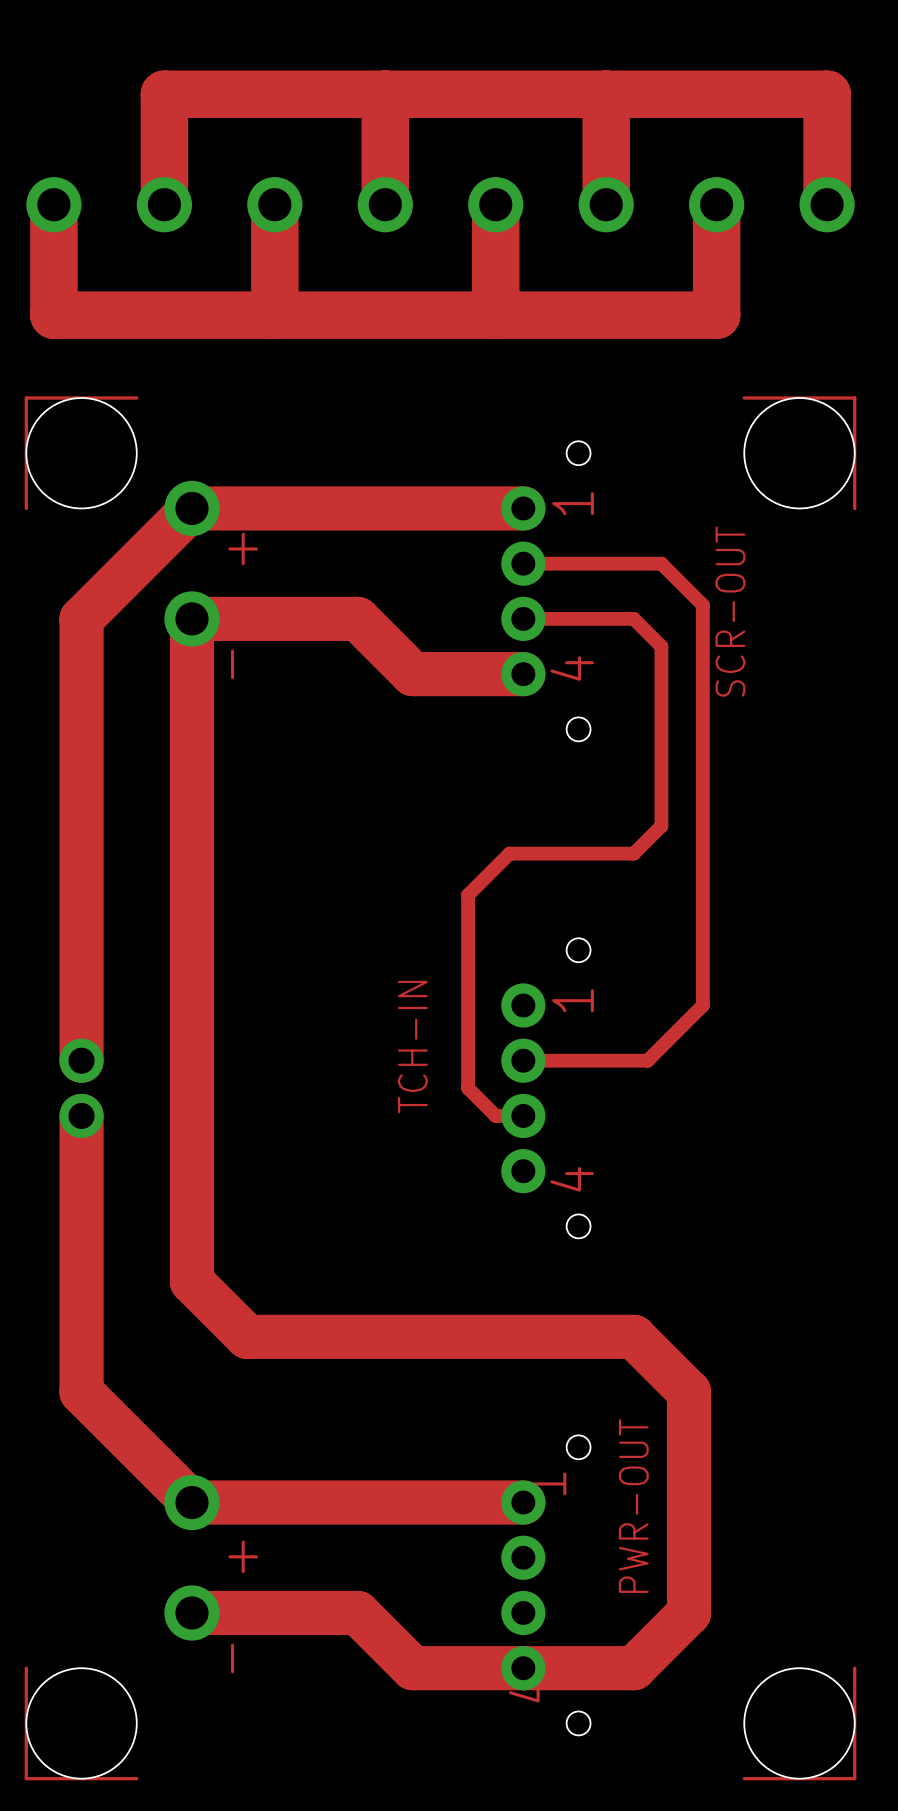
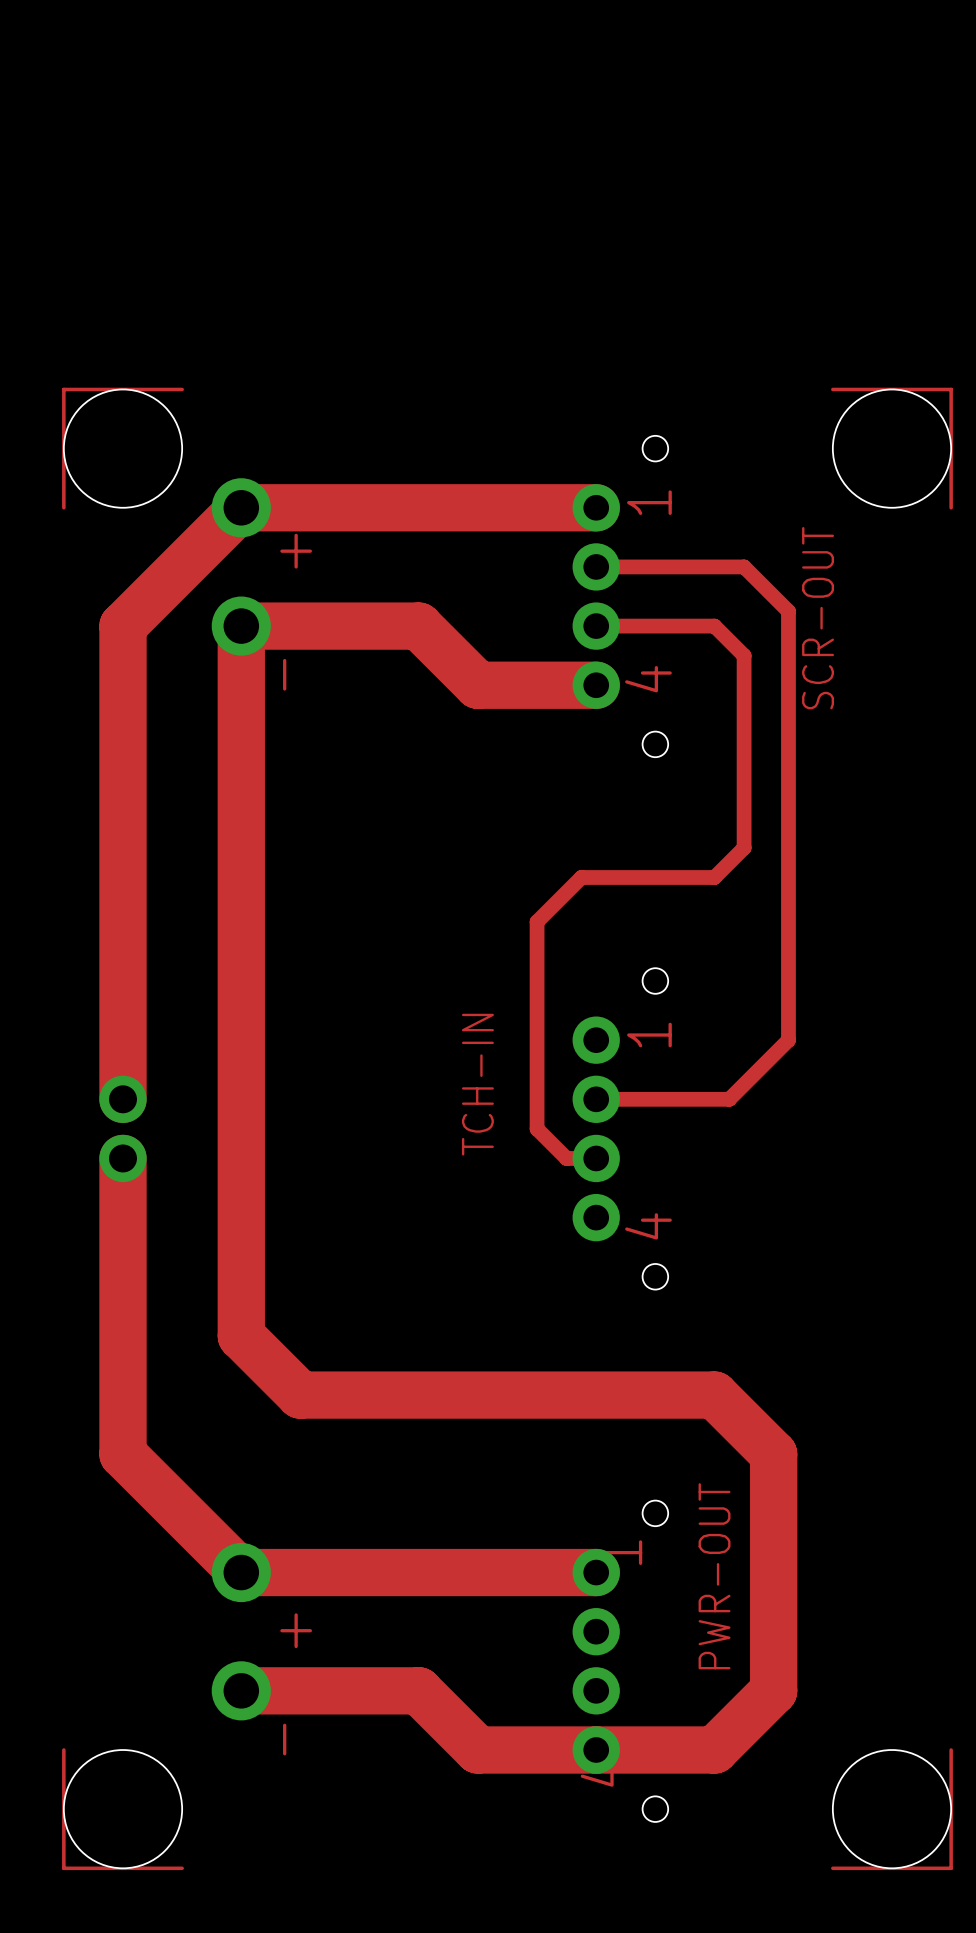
top track: (385, 94) (385, 204) -> none
top track: (606, 94) (606, 204) -> none
top track: (53, 204) (53, 315) (716, 315) (716, 204) -> none
via: (53, 204) -> none
top track: (164, 204) (164, 94) (827, 94) (827, 204) -> none
via: (164, 204) -> none
top track: (274, 204) (274, 315) -> none
via: (274, 204) -> none
via: (385, 204) -> none
top track: (495, 204) (495, 315) -> none
via: (495, 204) -> none
via: (606, 204) -> none
via: (716, 204) -> none
via: (827, 204) -> none

